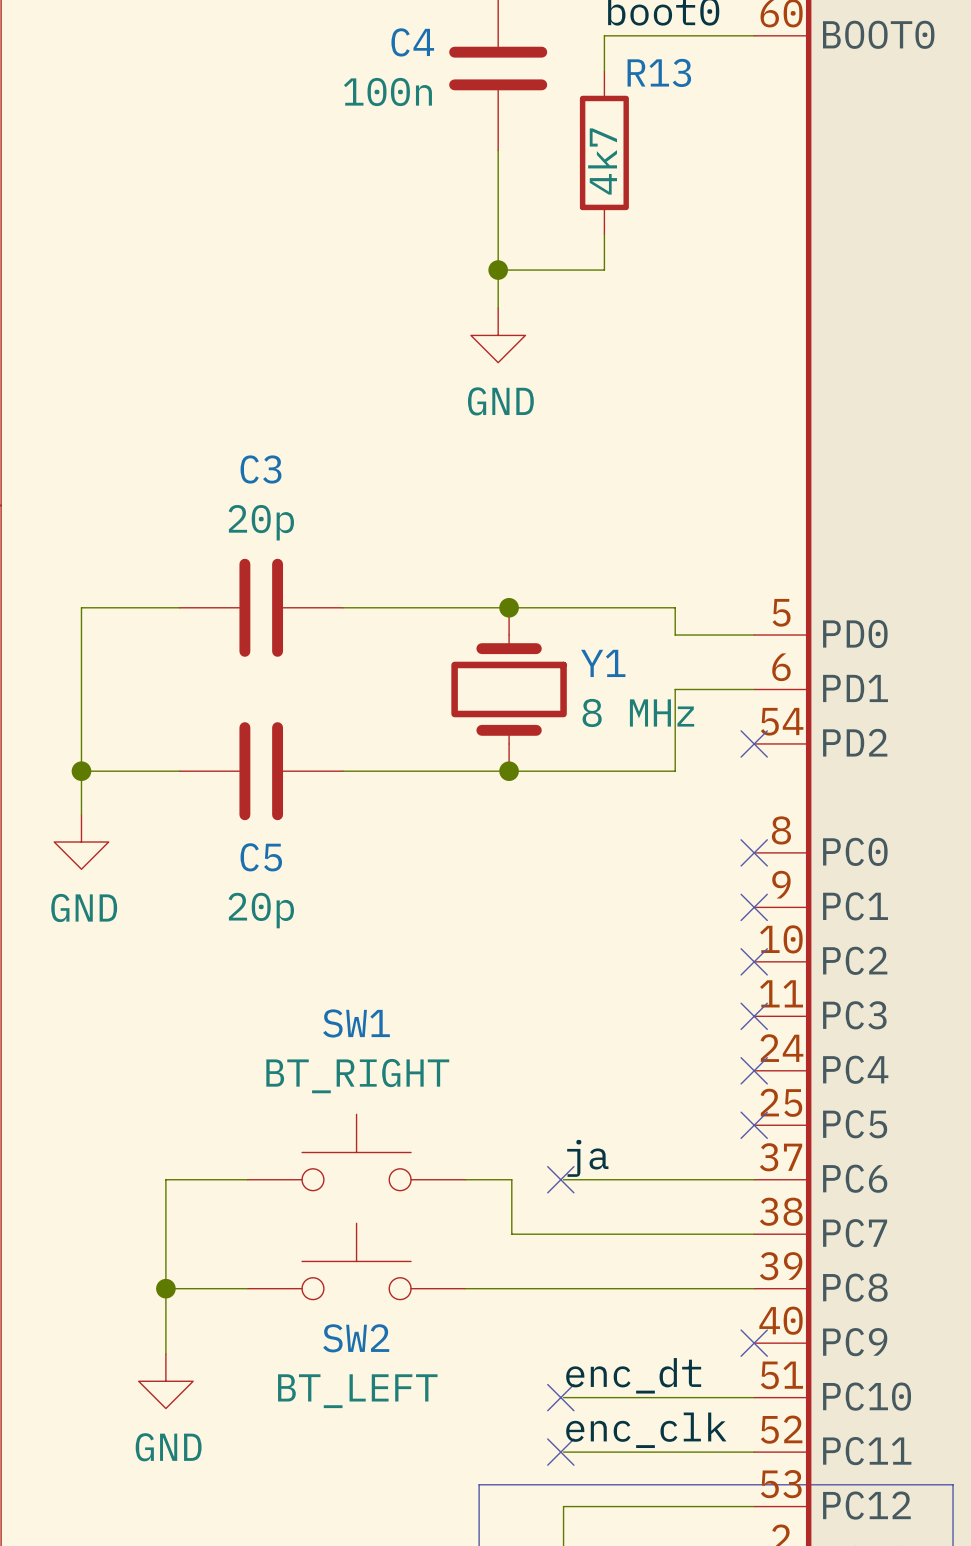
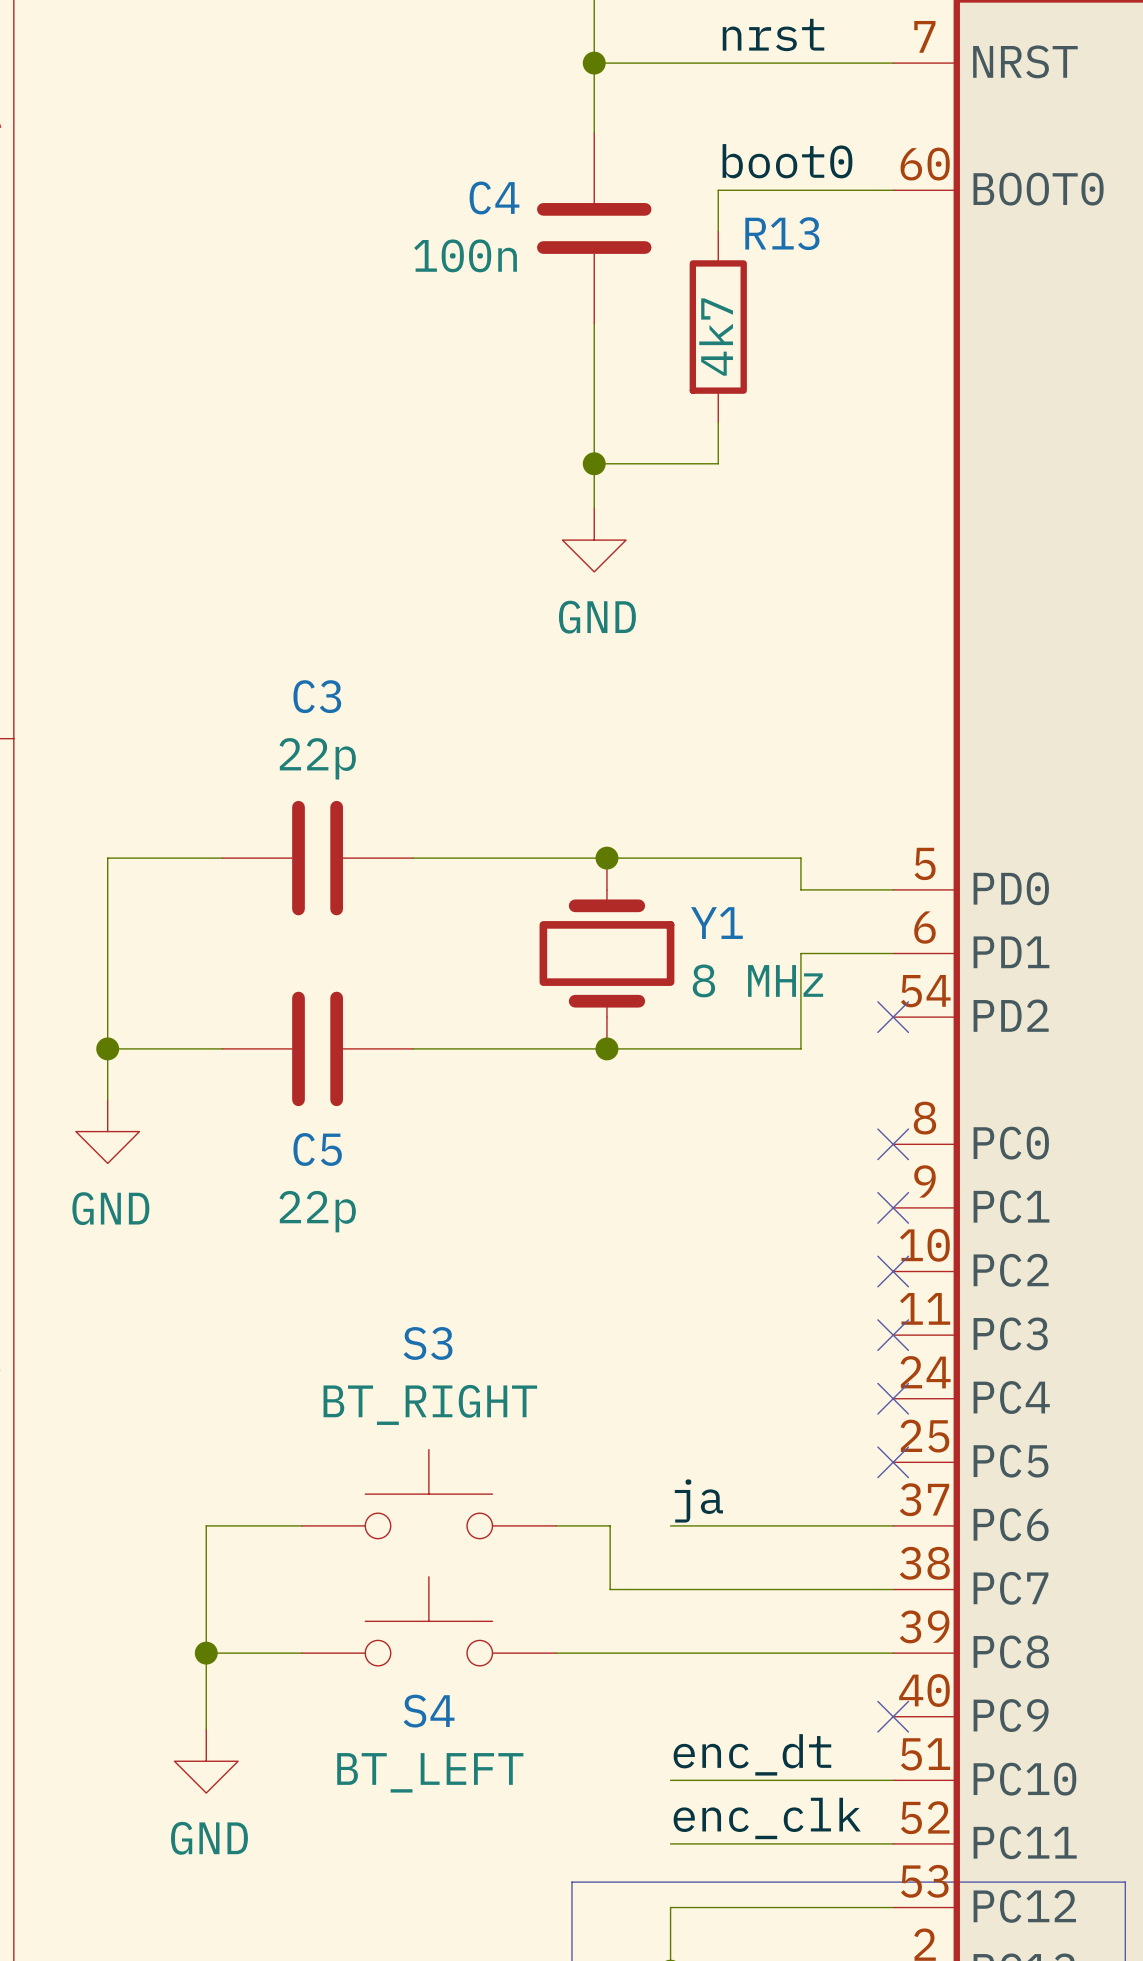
C3 value: 20p (261, 522) -> 22p (317, 758)
C5 value: 20p (261, 910) -> 22p (317, 1211)
SW1 name: SW1 (356, 1023) -> S3 (428, 1343)
no-connect mark: (560, 1179) -> none
SW2 name: SW2 (356, 1338) -> S4 (429, 1711)
no-connect mark: (560, 1397) -> none
no-connect mark: (560, 1452) -> none

